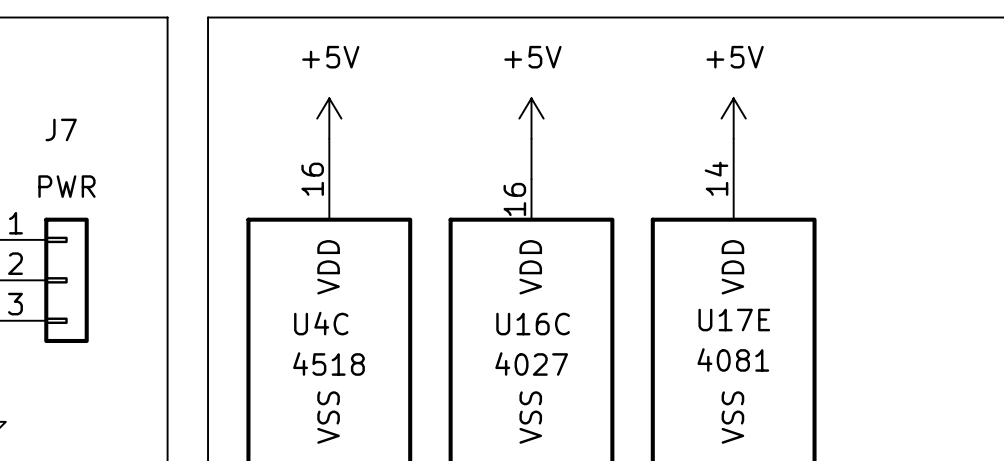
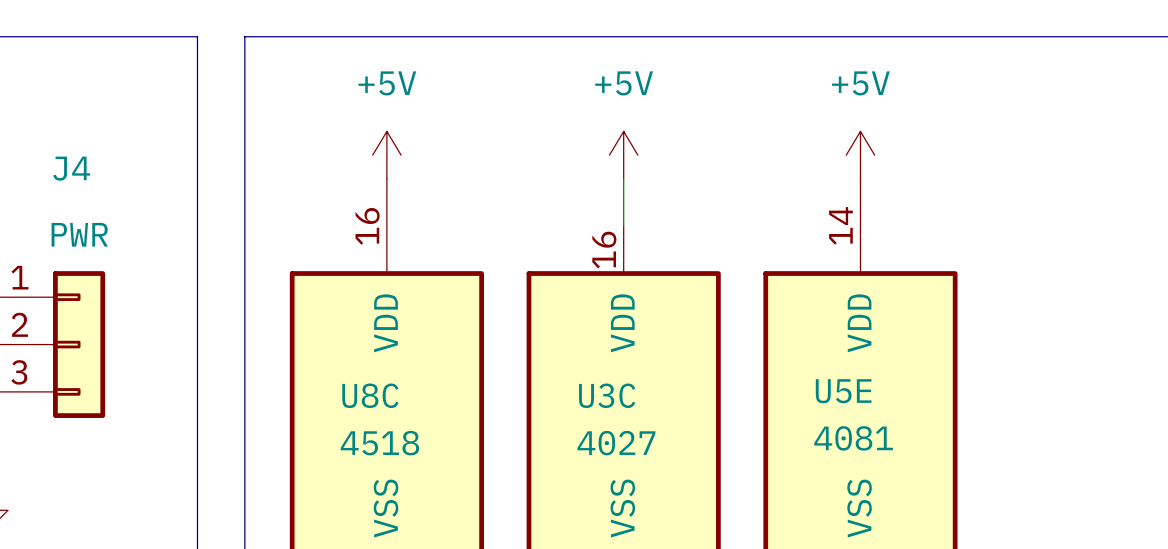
J7 name: J7 (61, 129) -> J4 (71, 168)
U17E name: U17E (734, 320) -> U5E (843, 391)
U4C name: U4C (321, 323) -> U8C (370, 395)
U16C name: U16C (533, 324) -> U3C (607, 395)

